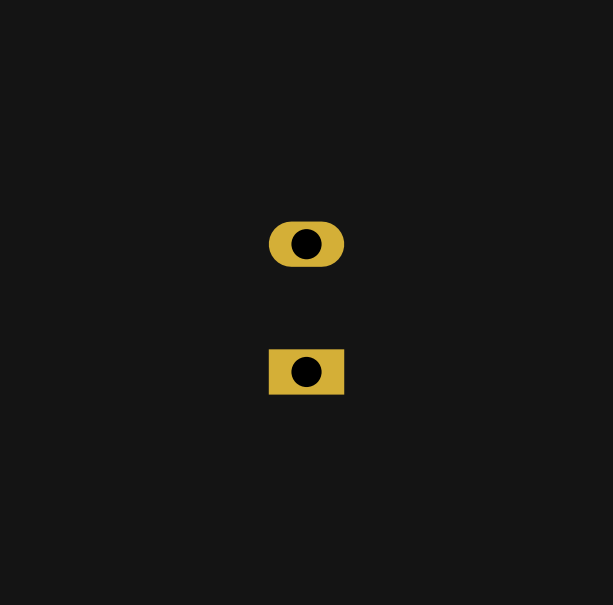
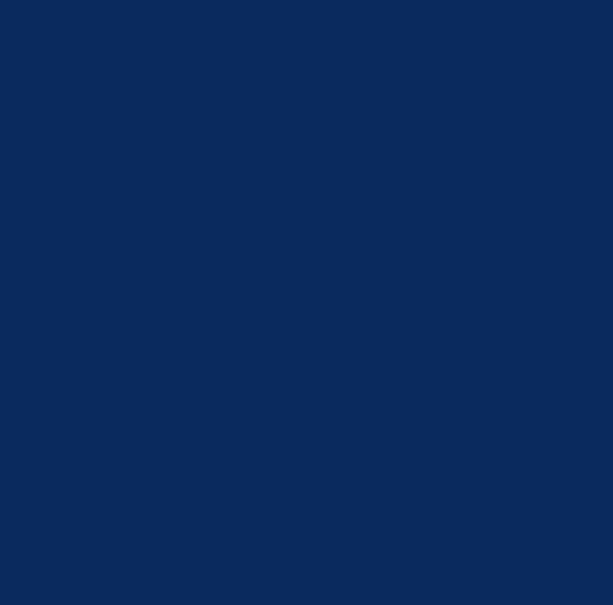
part: (306, 308) -> none

